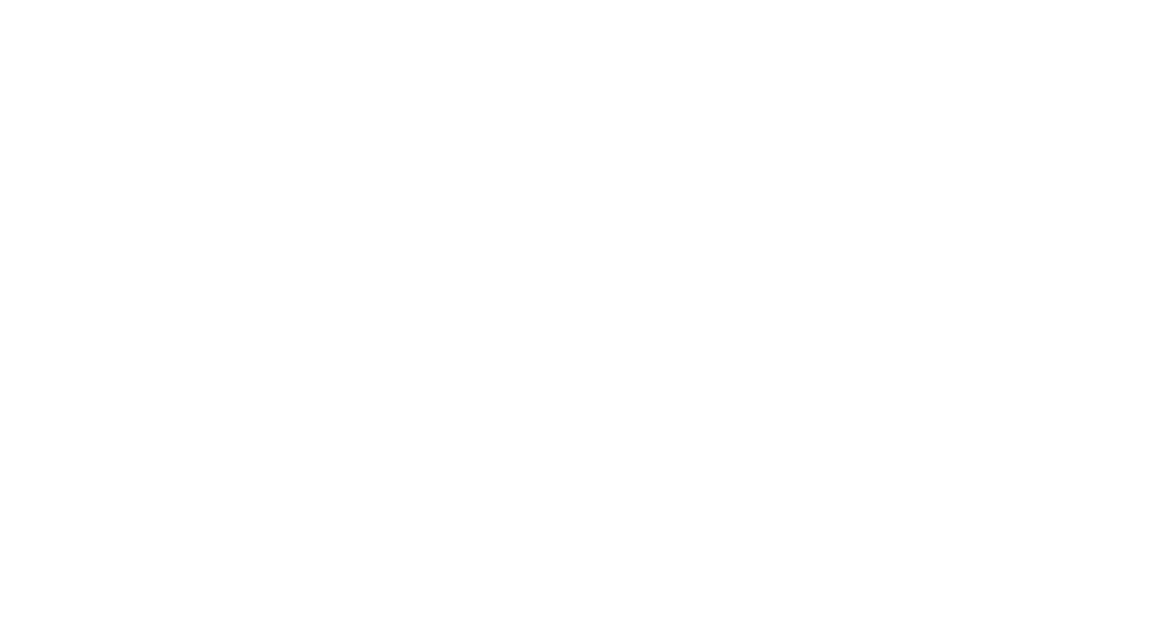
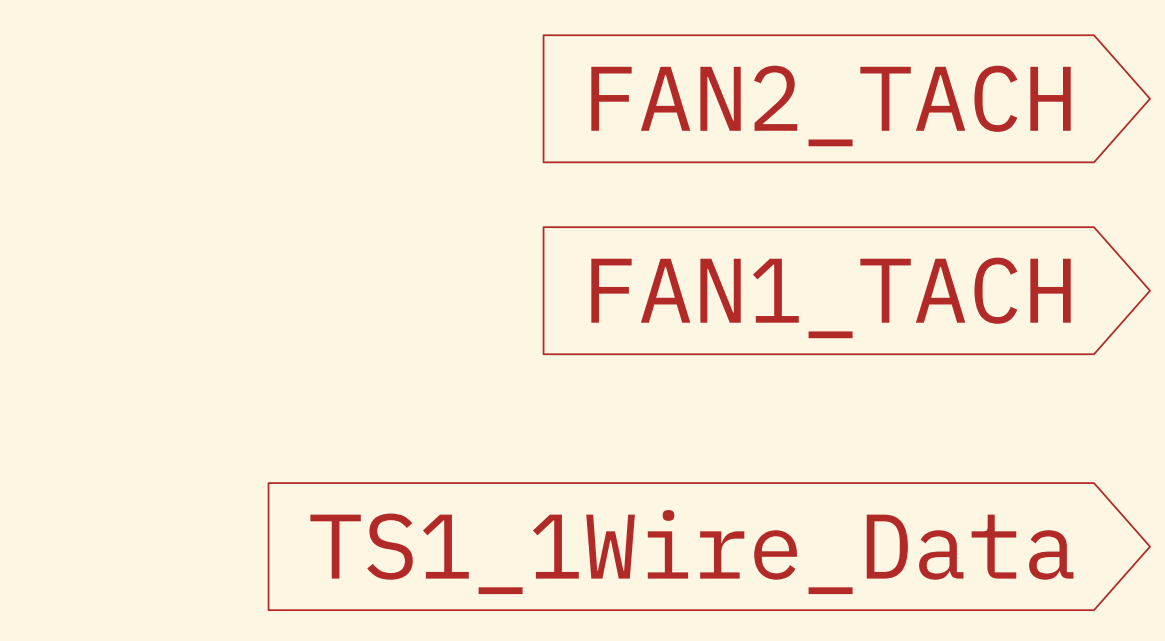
global label: none -> FAN2_TACH (831, 105)
global label: none -> FAN1_TACH (831, 297)
global label: none -> TS1_1Wire_Data (691, 552)

